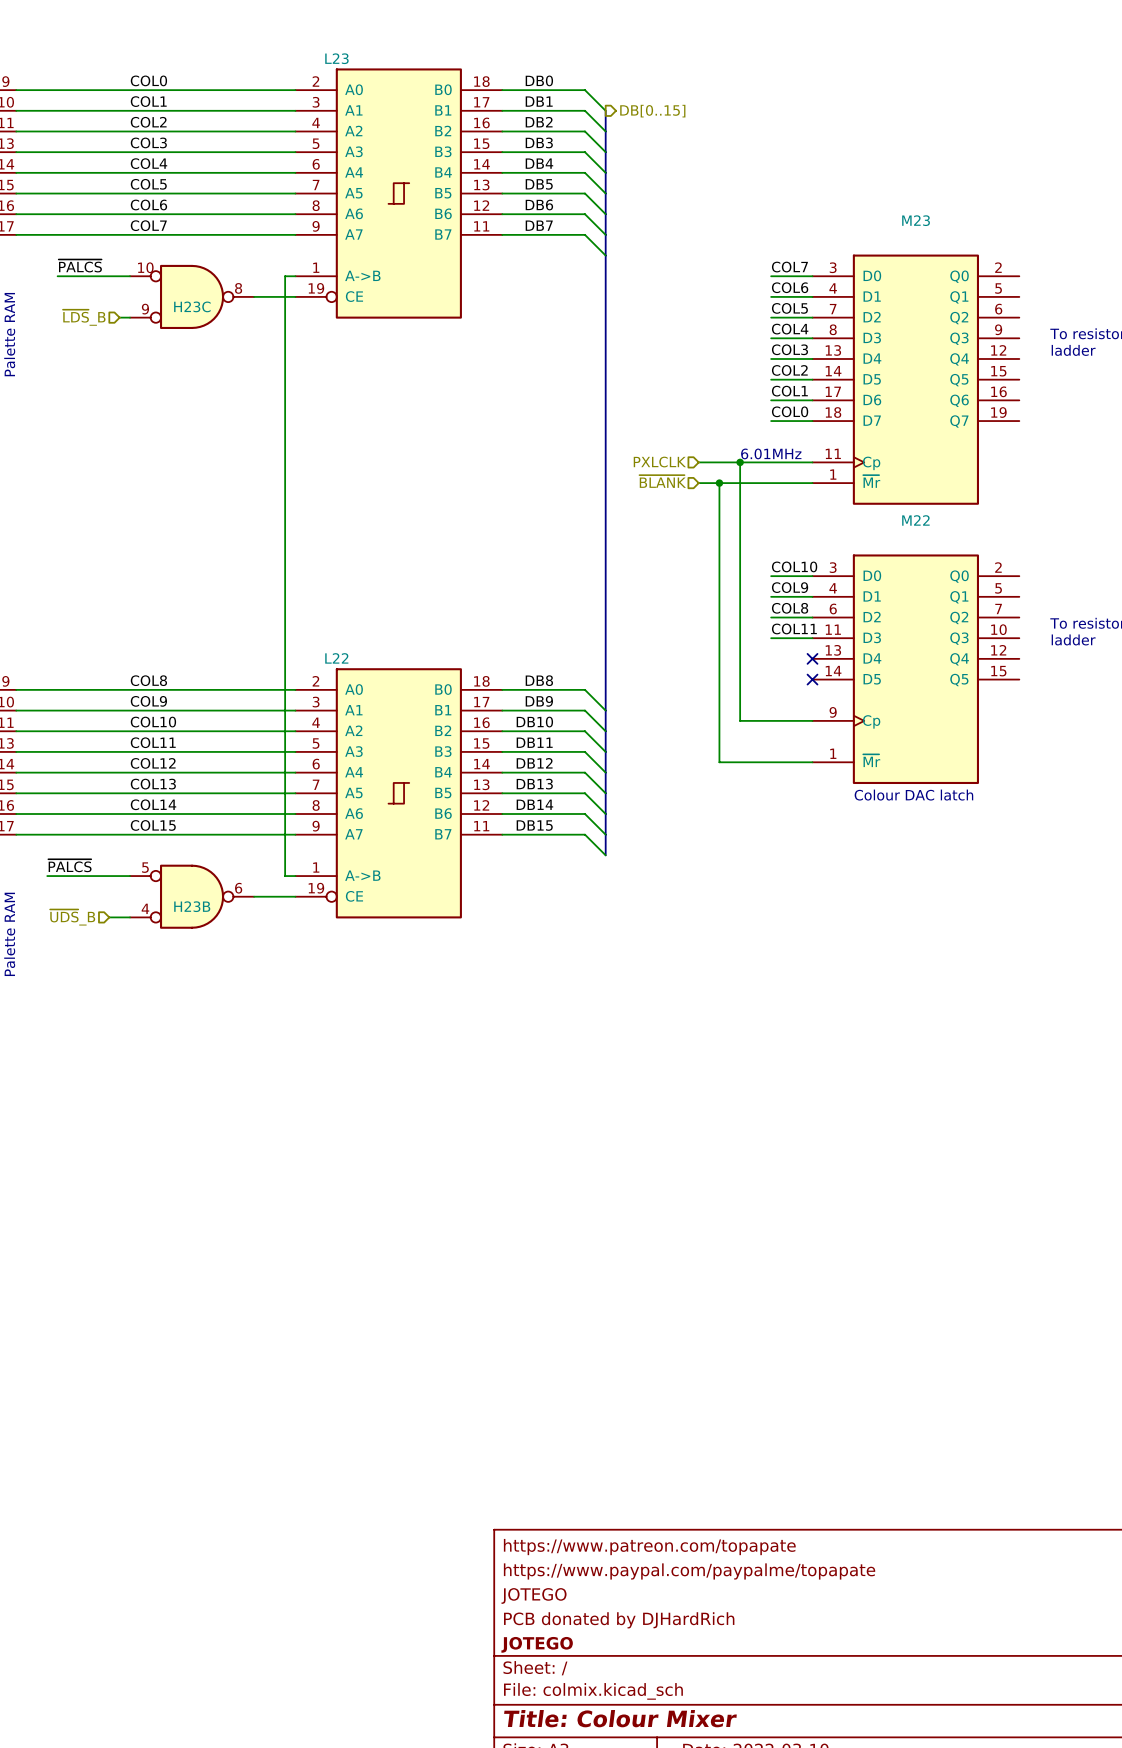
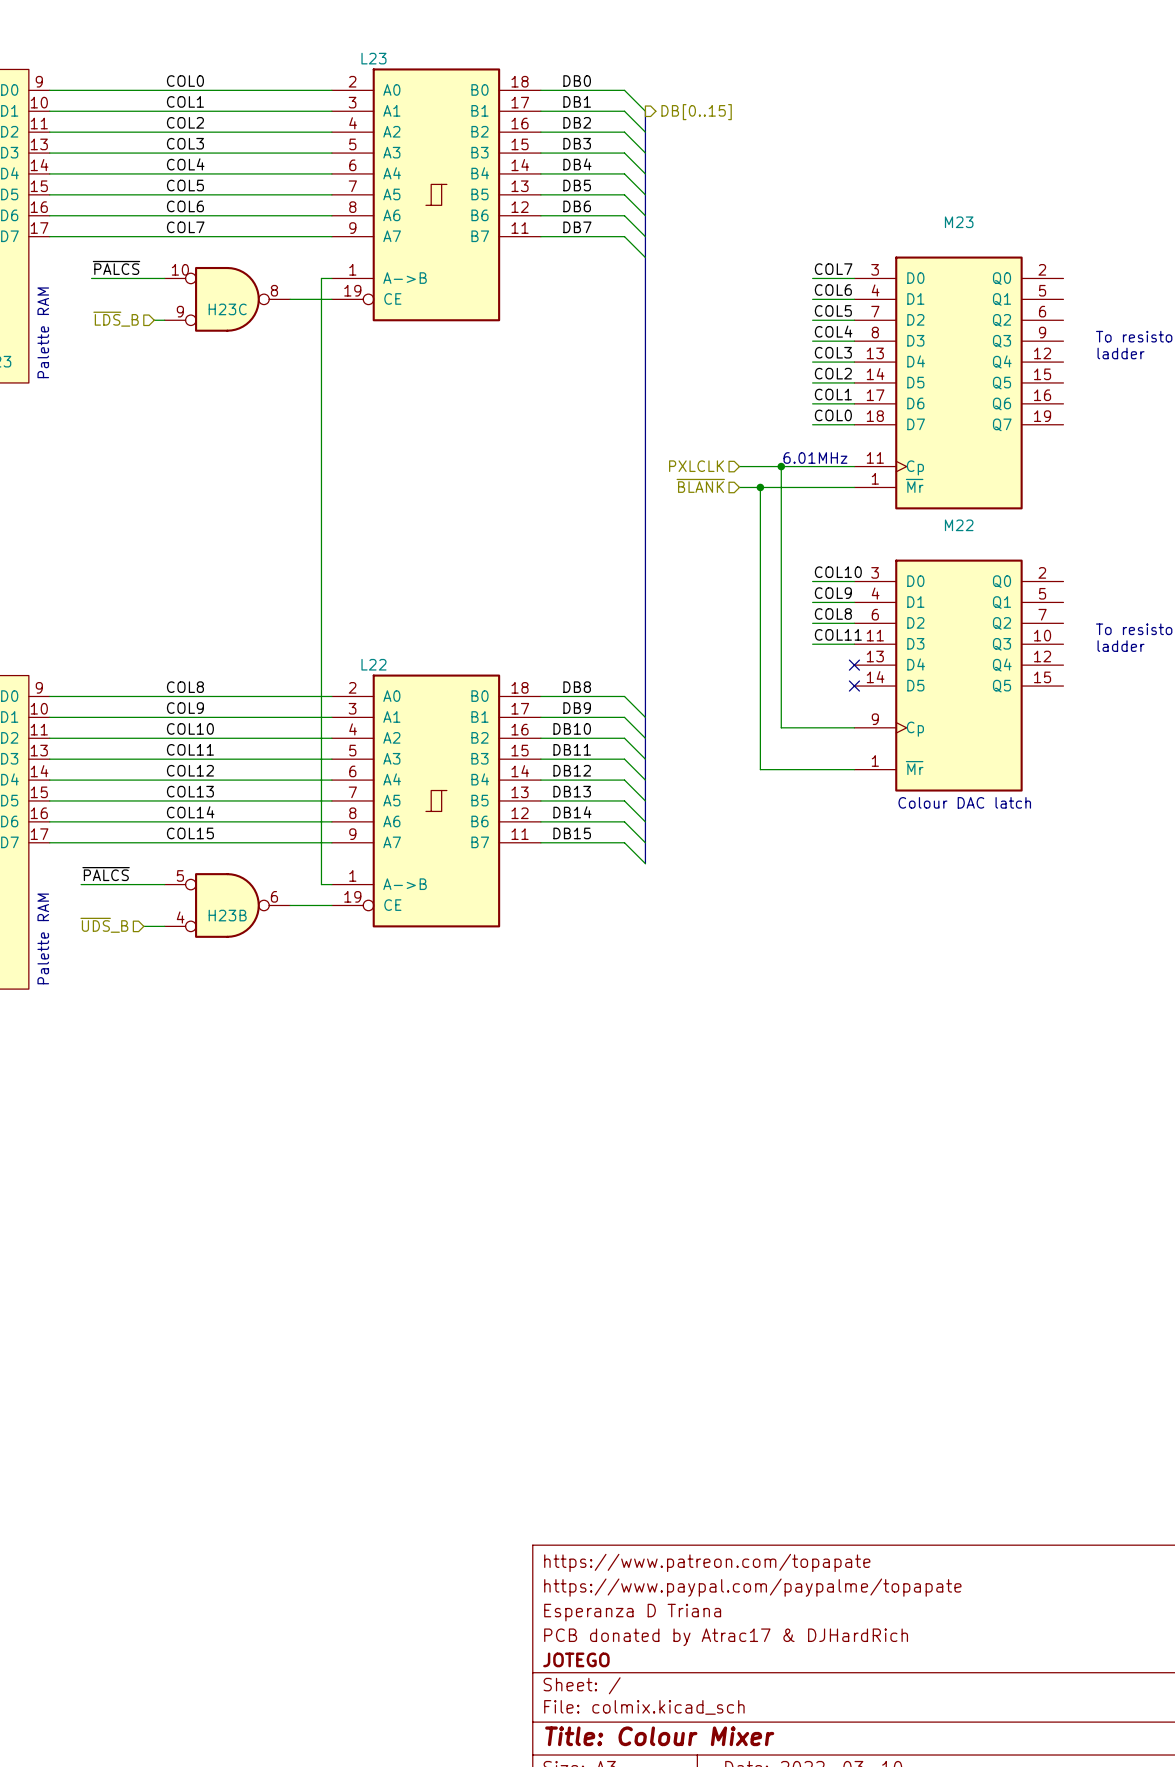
title block: JOTEGO (534, 1595) -> Esperanza D Triana (632, 1612)
title block: PCB donated by DJHardRich (619, 1620) -> PCB donated by Atrac17 & DJHardRich (726, 1637)

